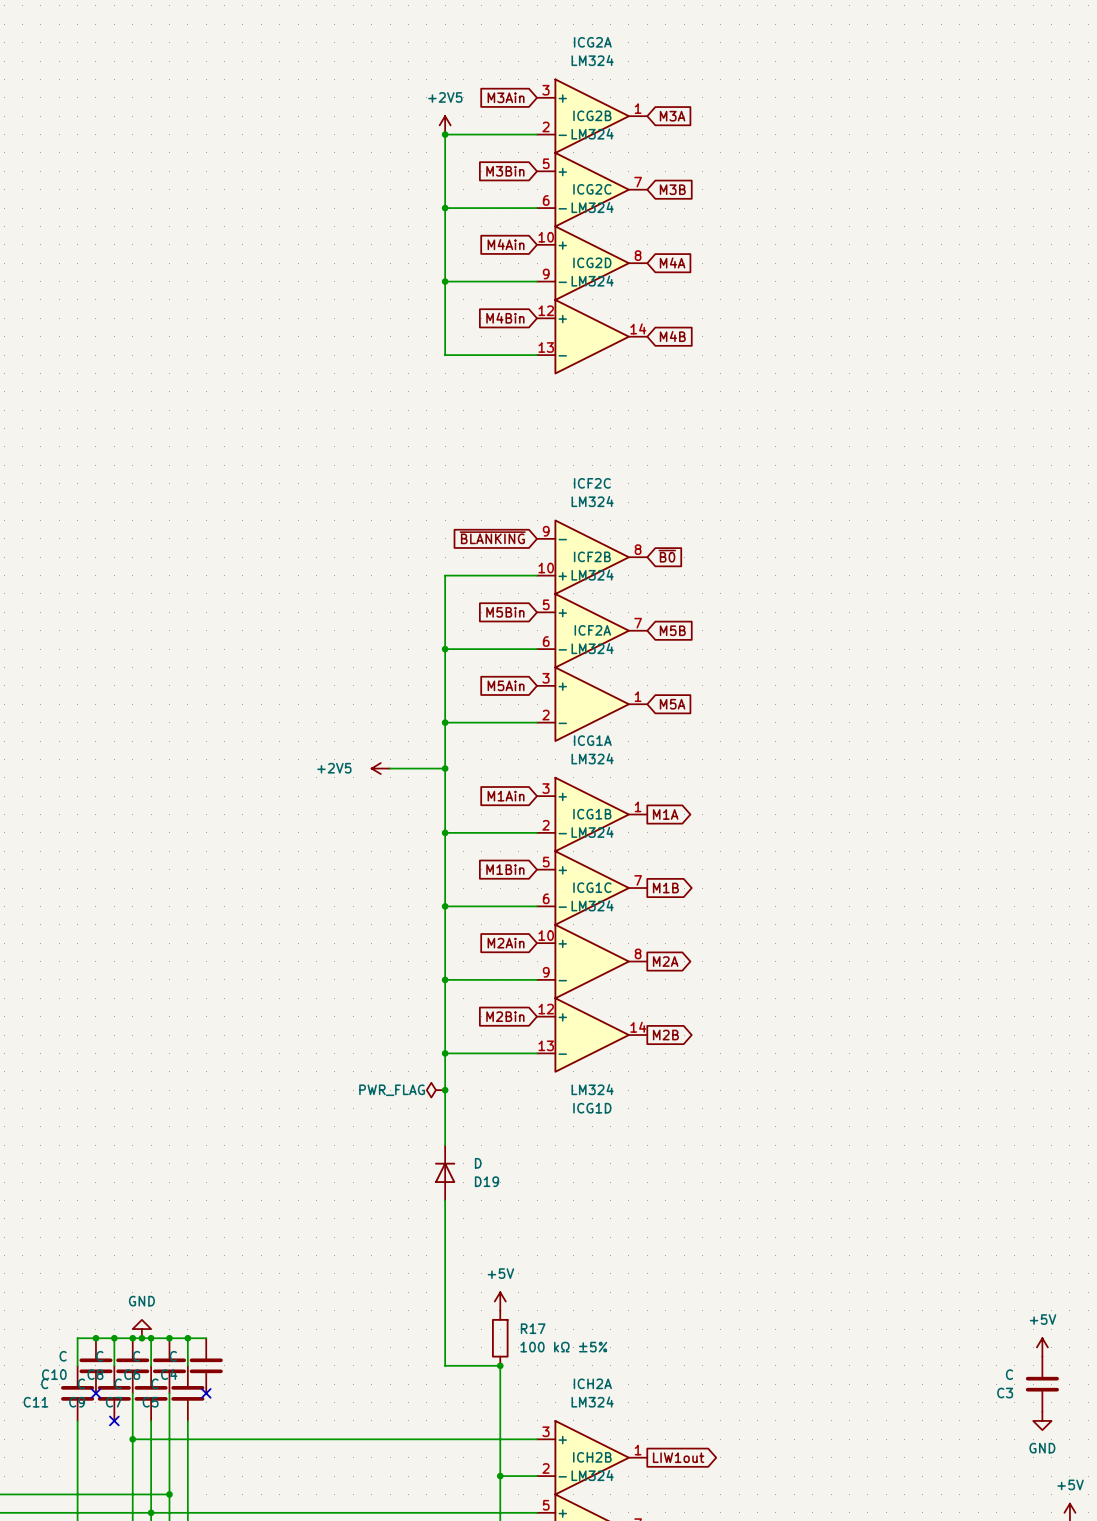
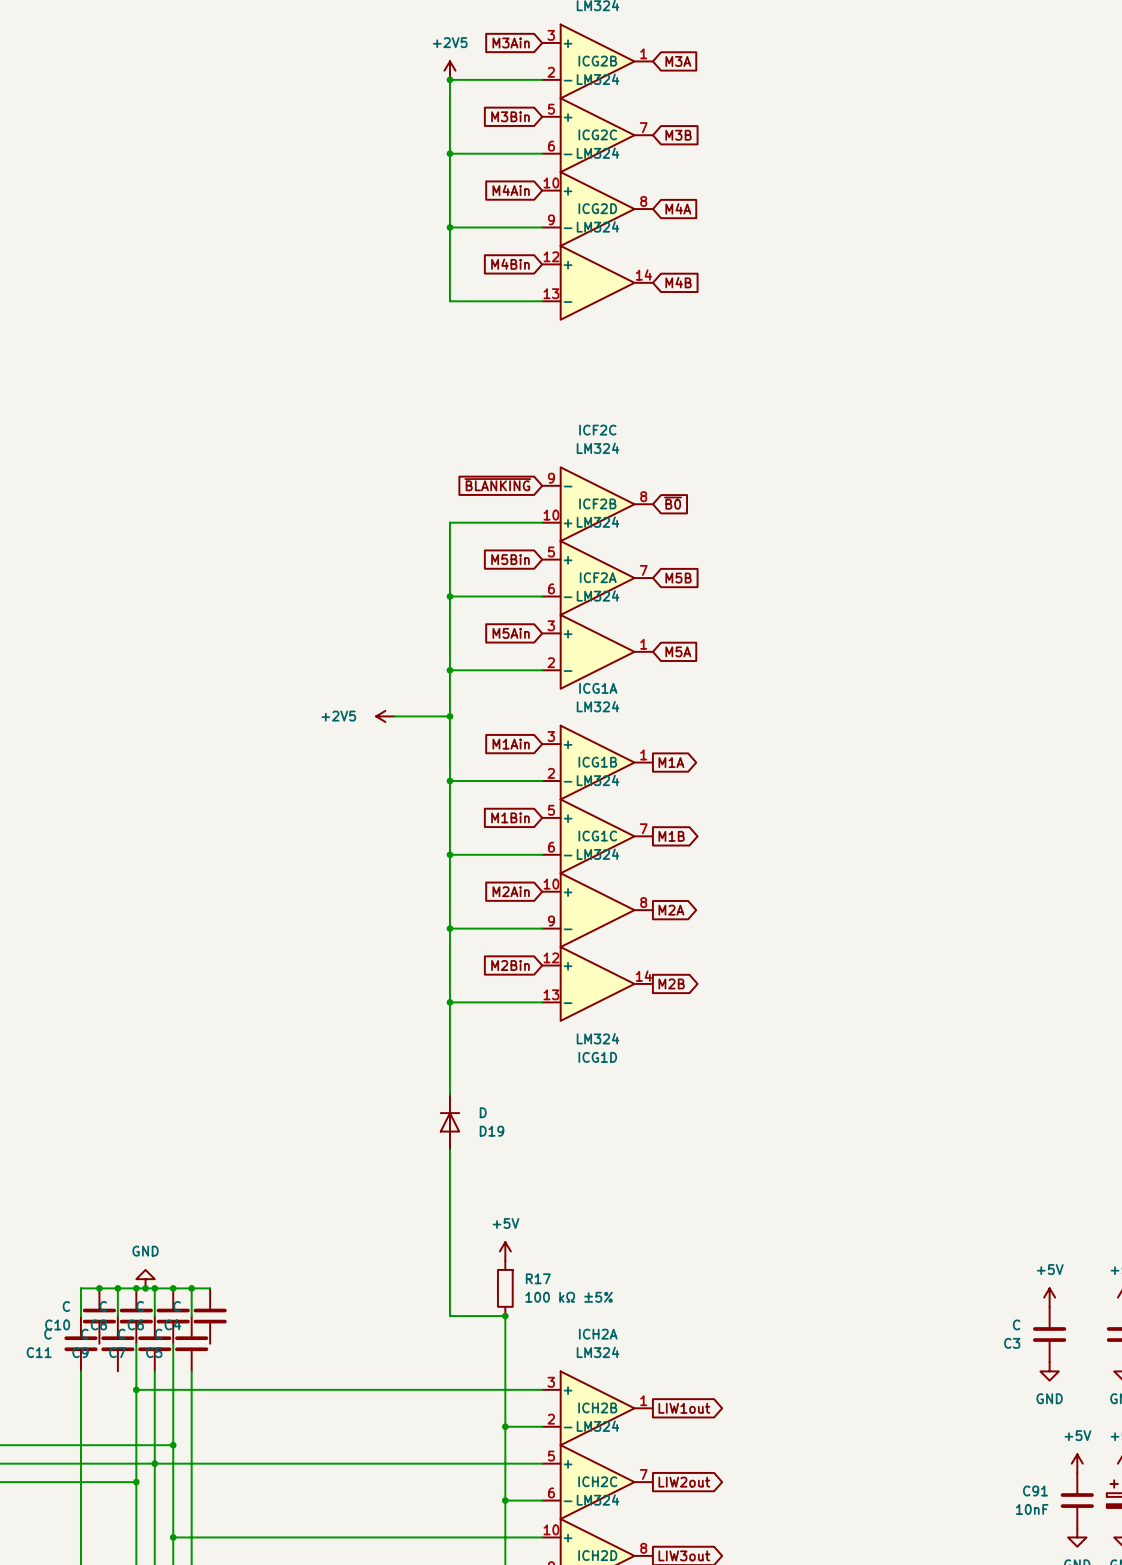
power symbol: PWR_FLAG (435, 1090) -> none
junction: (445, 1090) -> none
no-connect mark: (95, 1393) -> none
no-connect mark: (206, 1393) -> none
no-connect mark: (114, 1420) -> none

